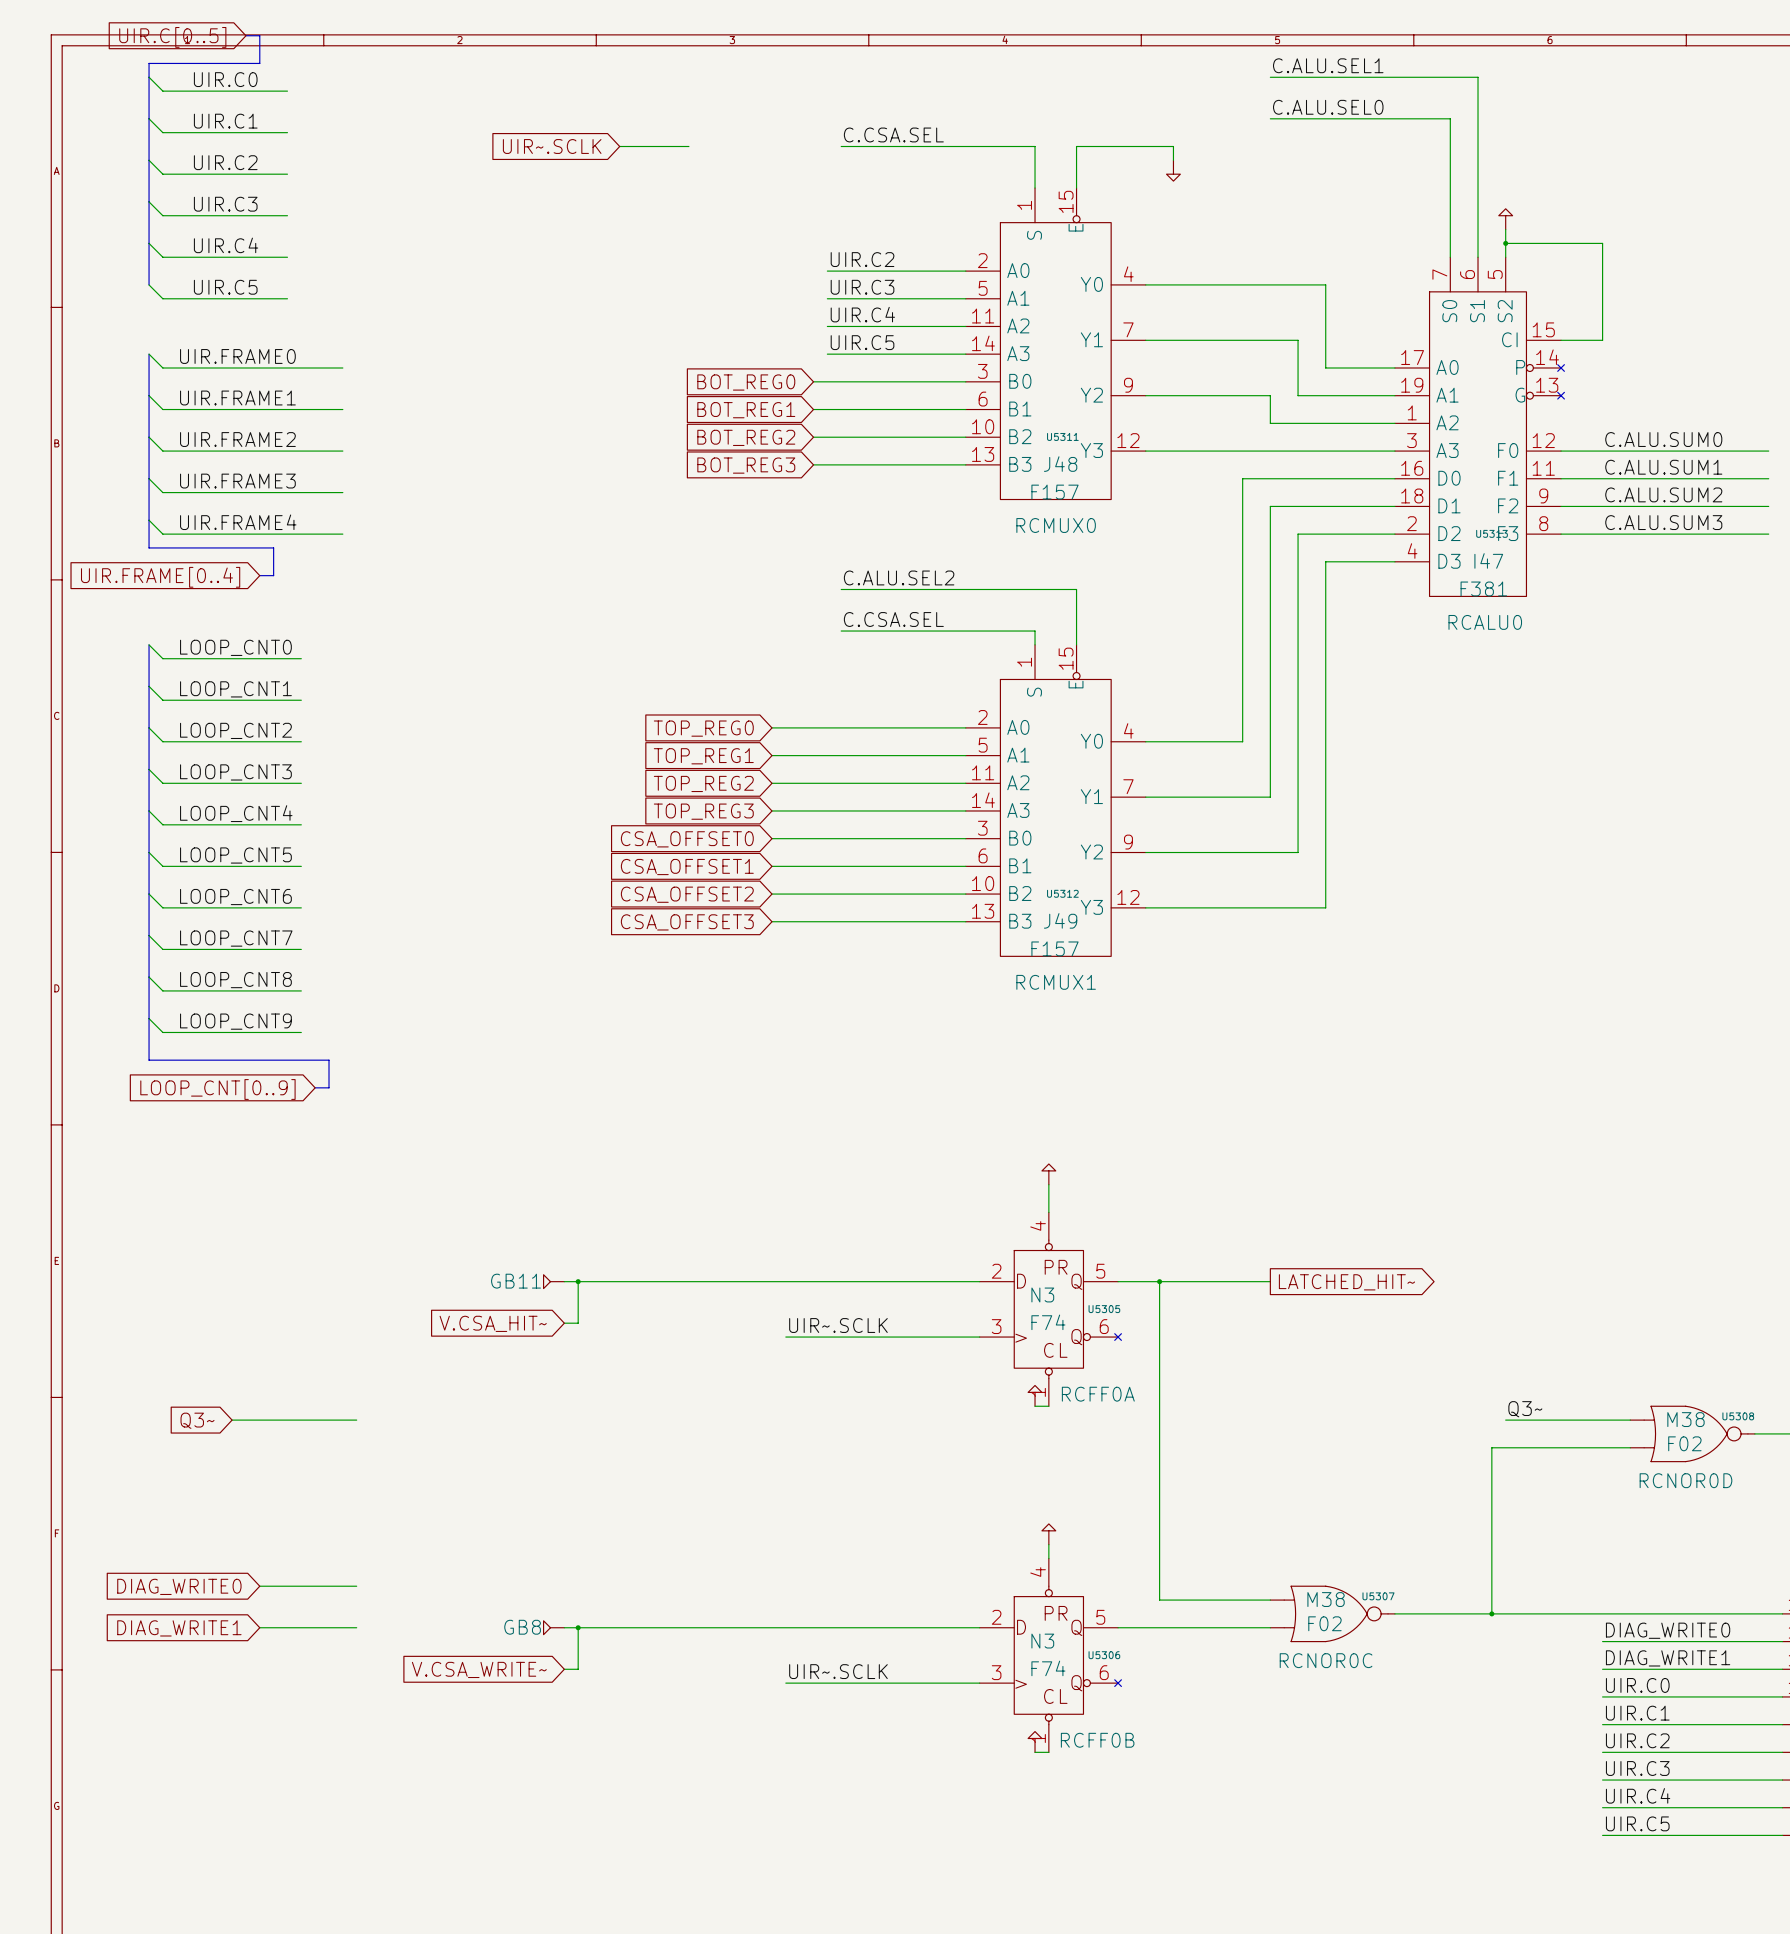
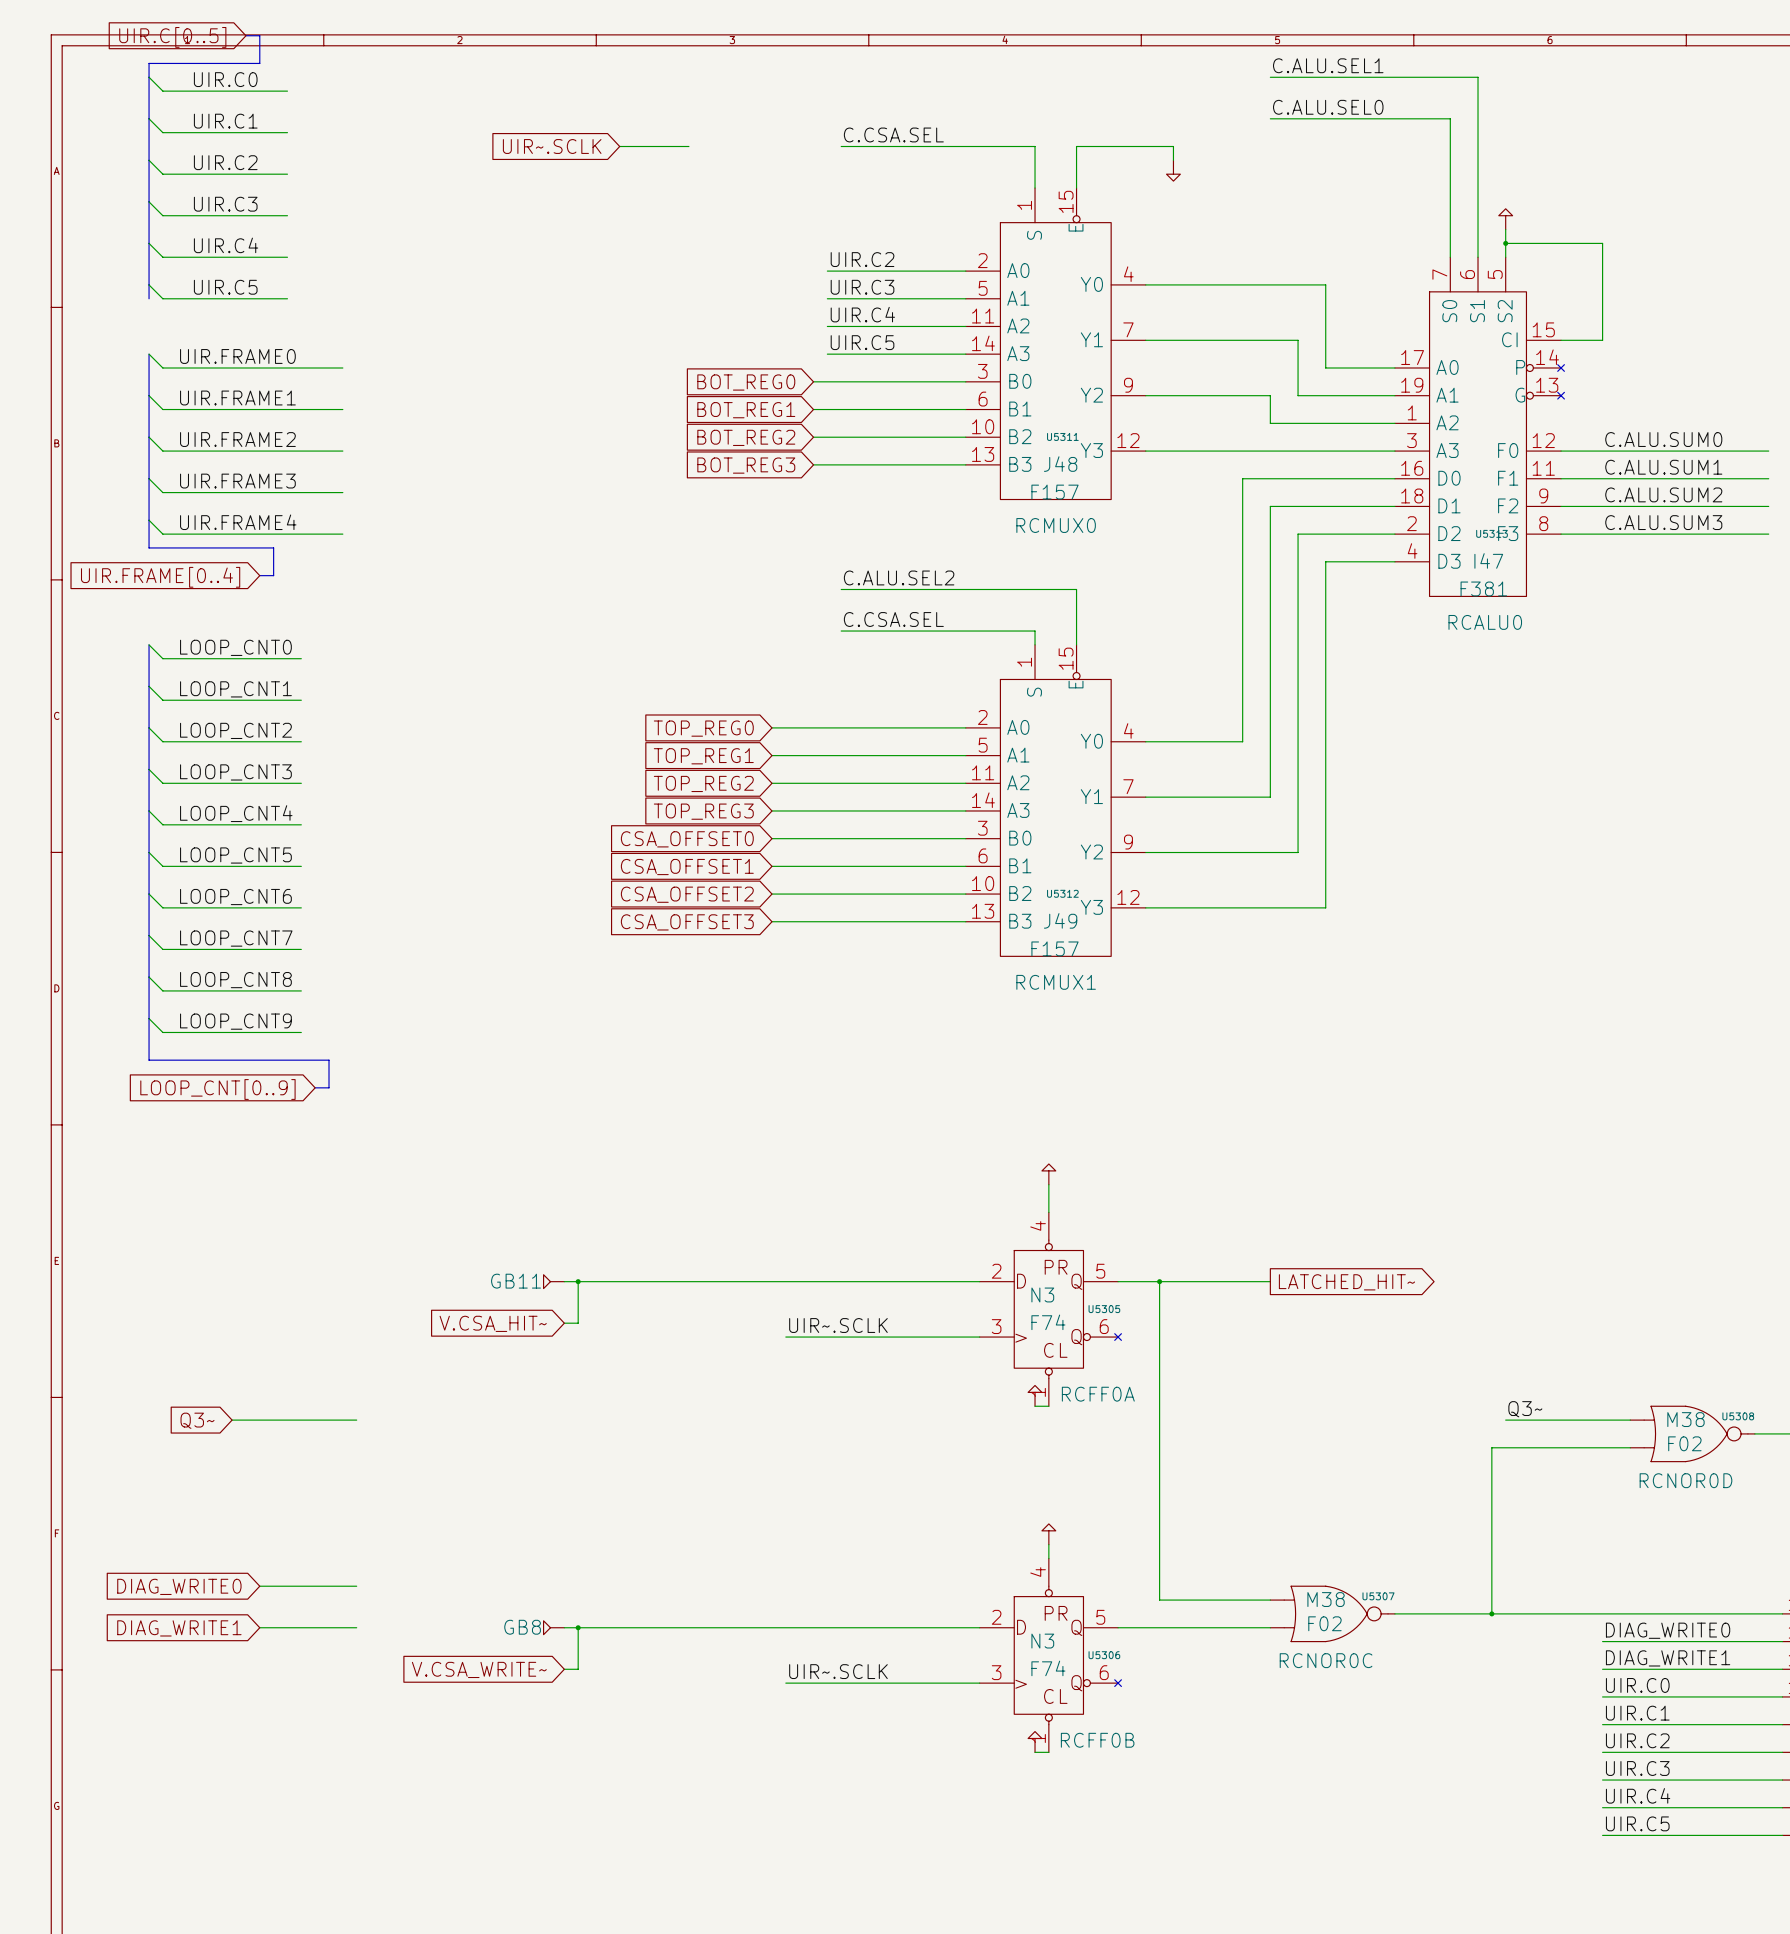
bus: none -> (149, 284) (149, 298)

